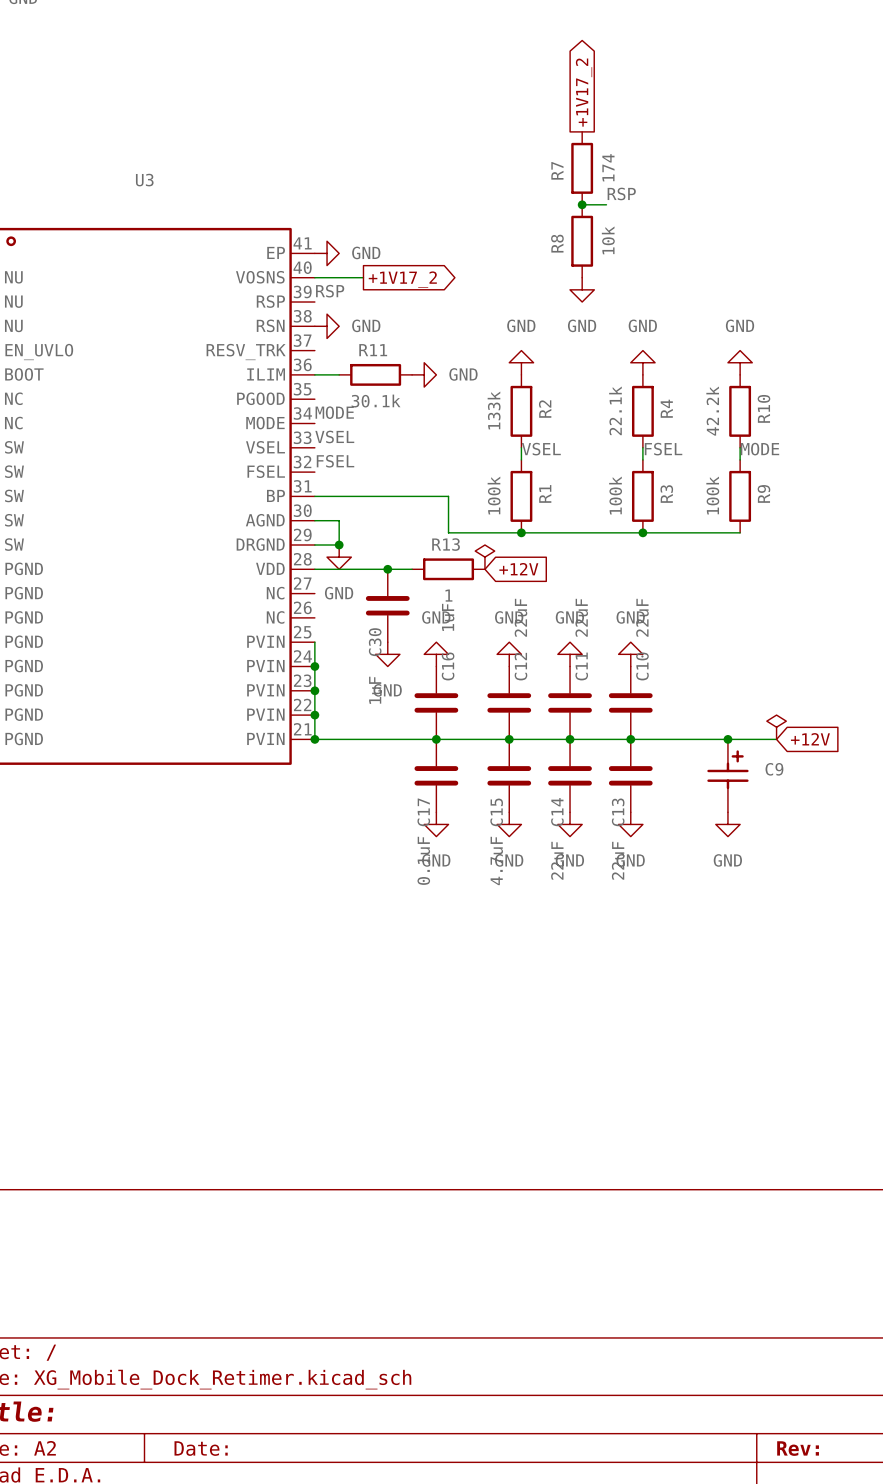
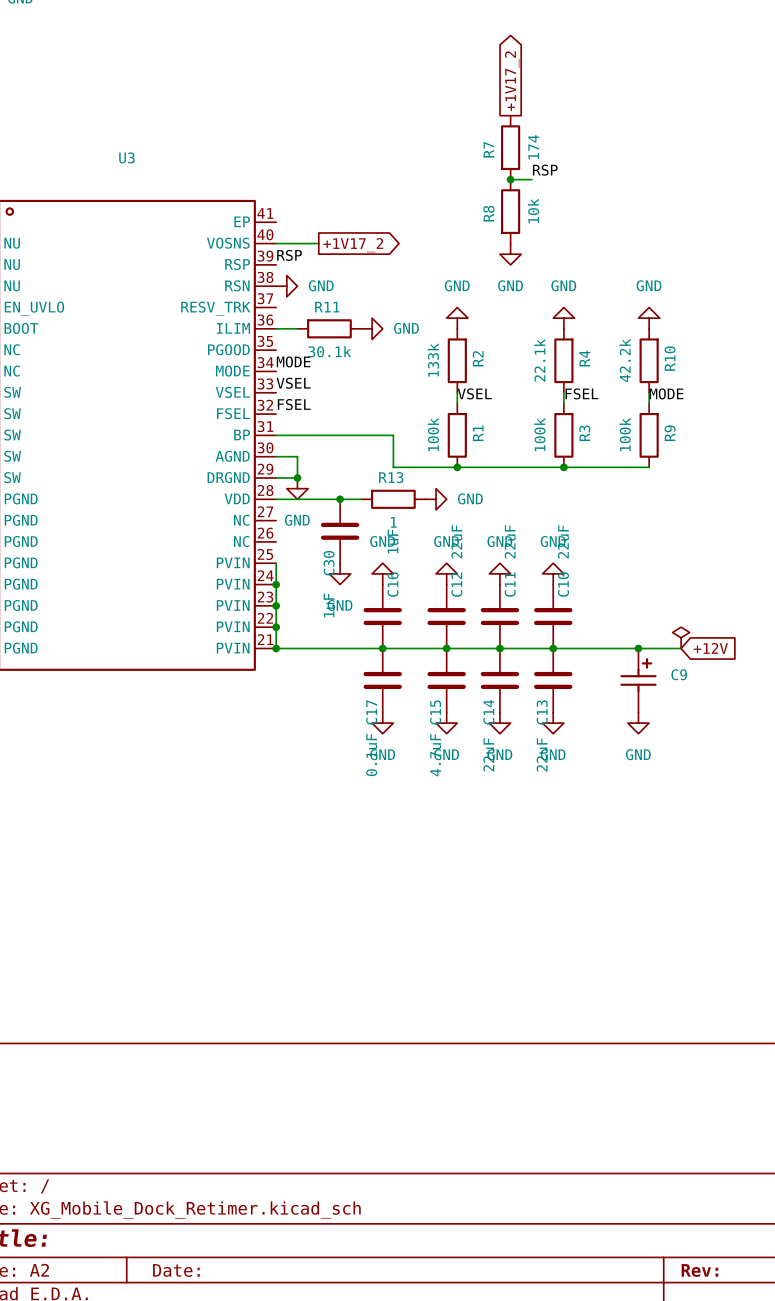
power symbol: GND (327, 253) -> none
power symbol: (484, 557) -> none
power symbol: none -> GND (436, 499)
global label: +12V (518, 569) -> none

